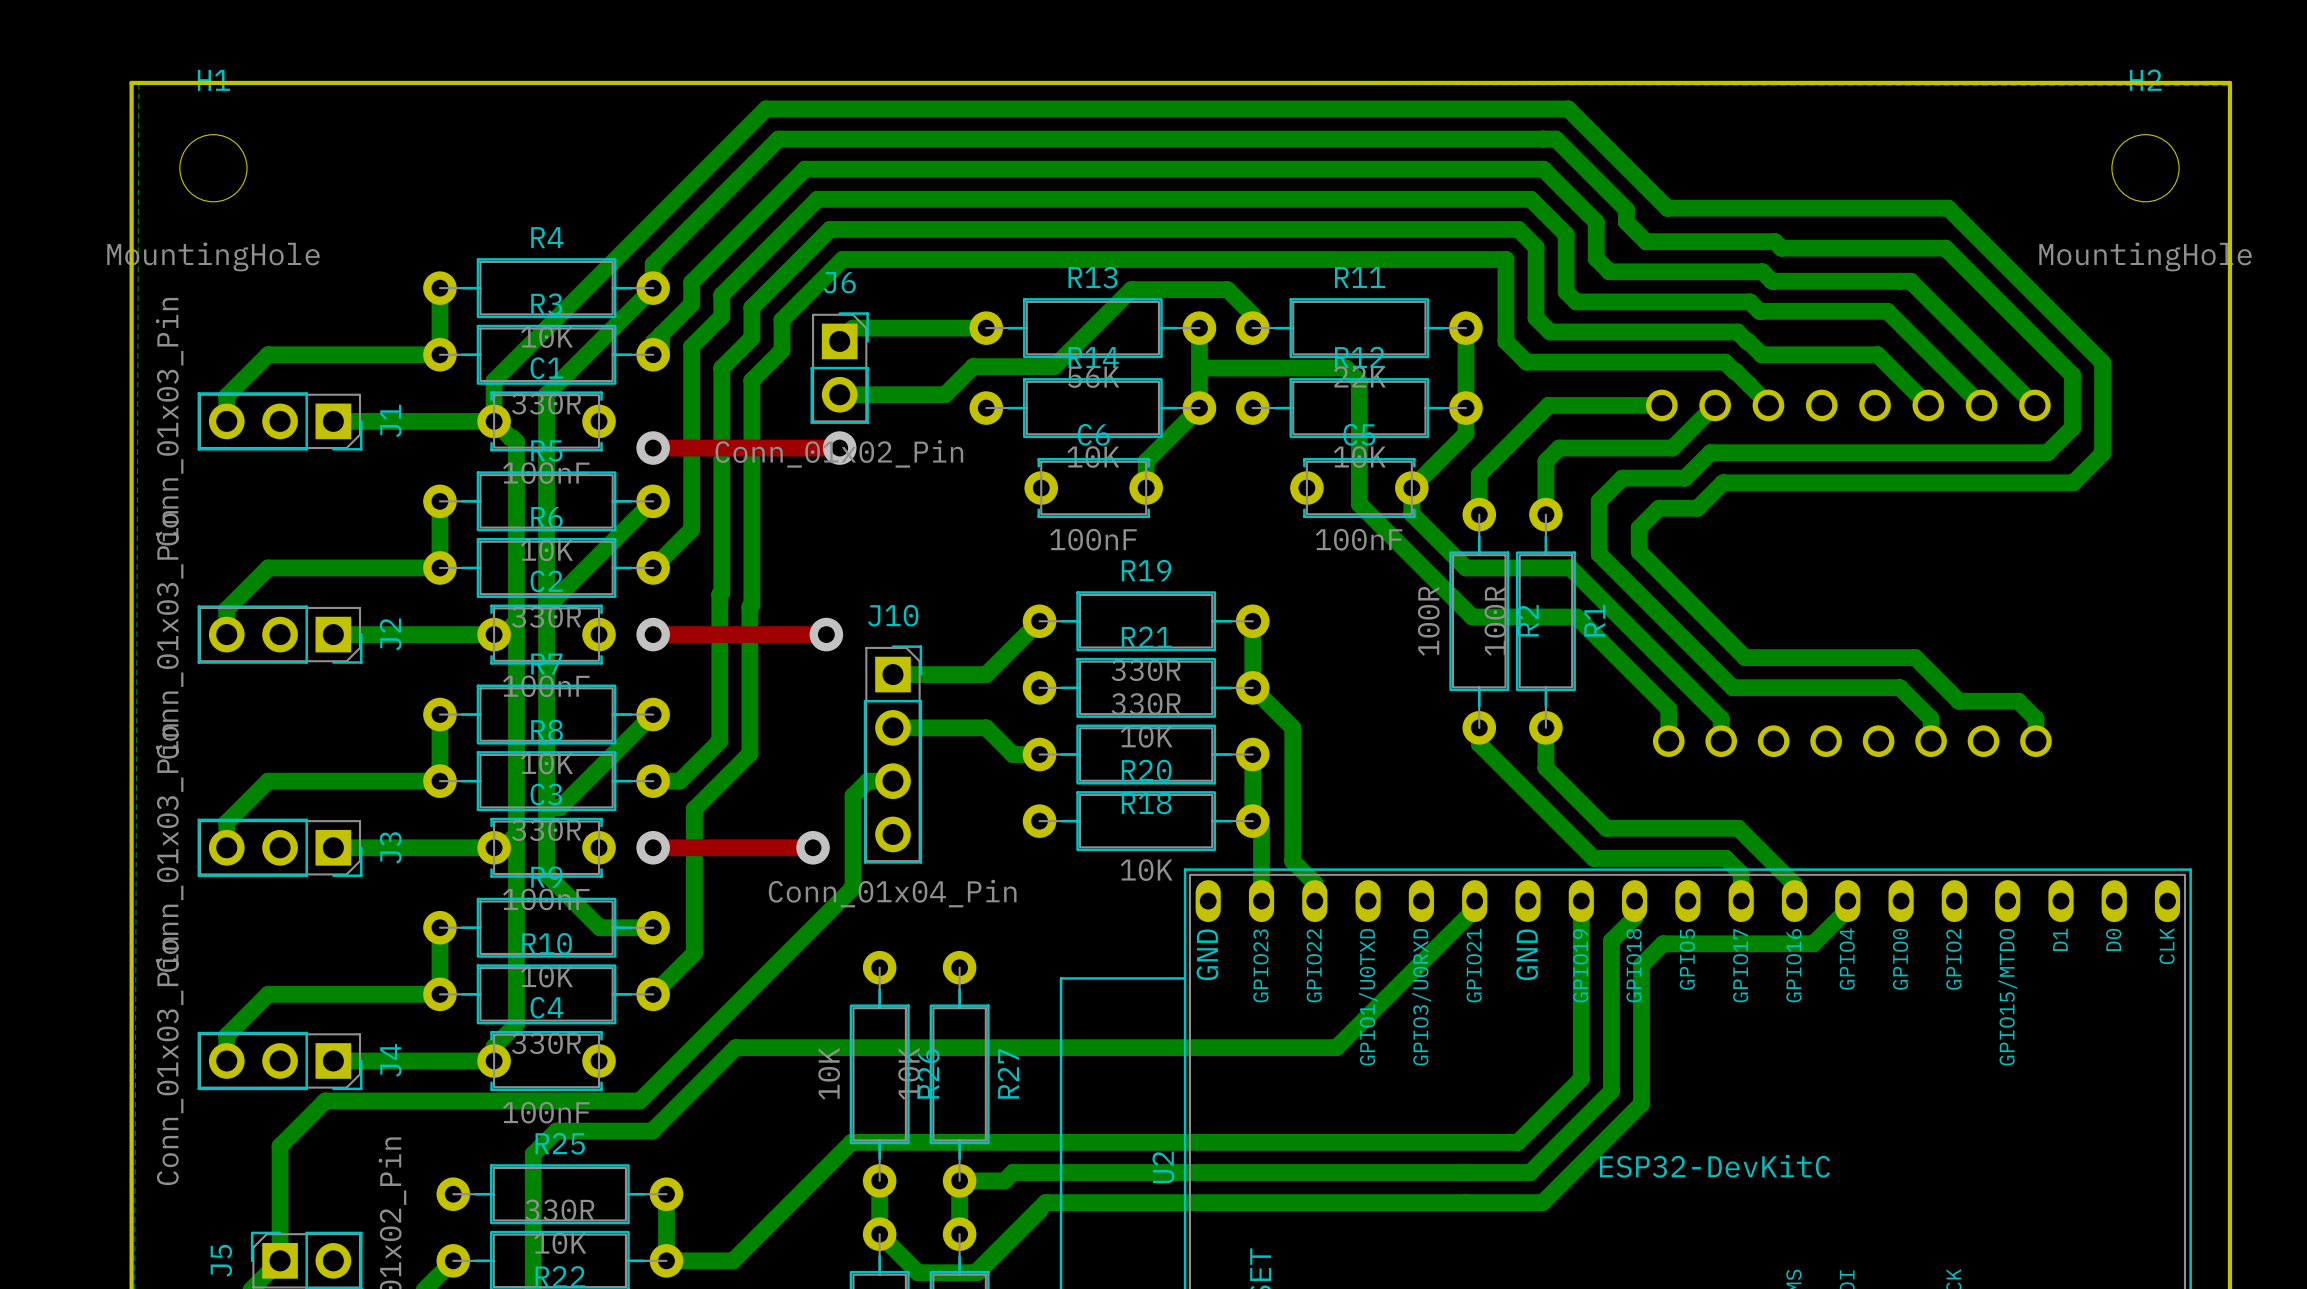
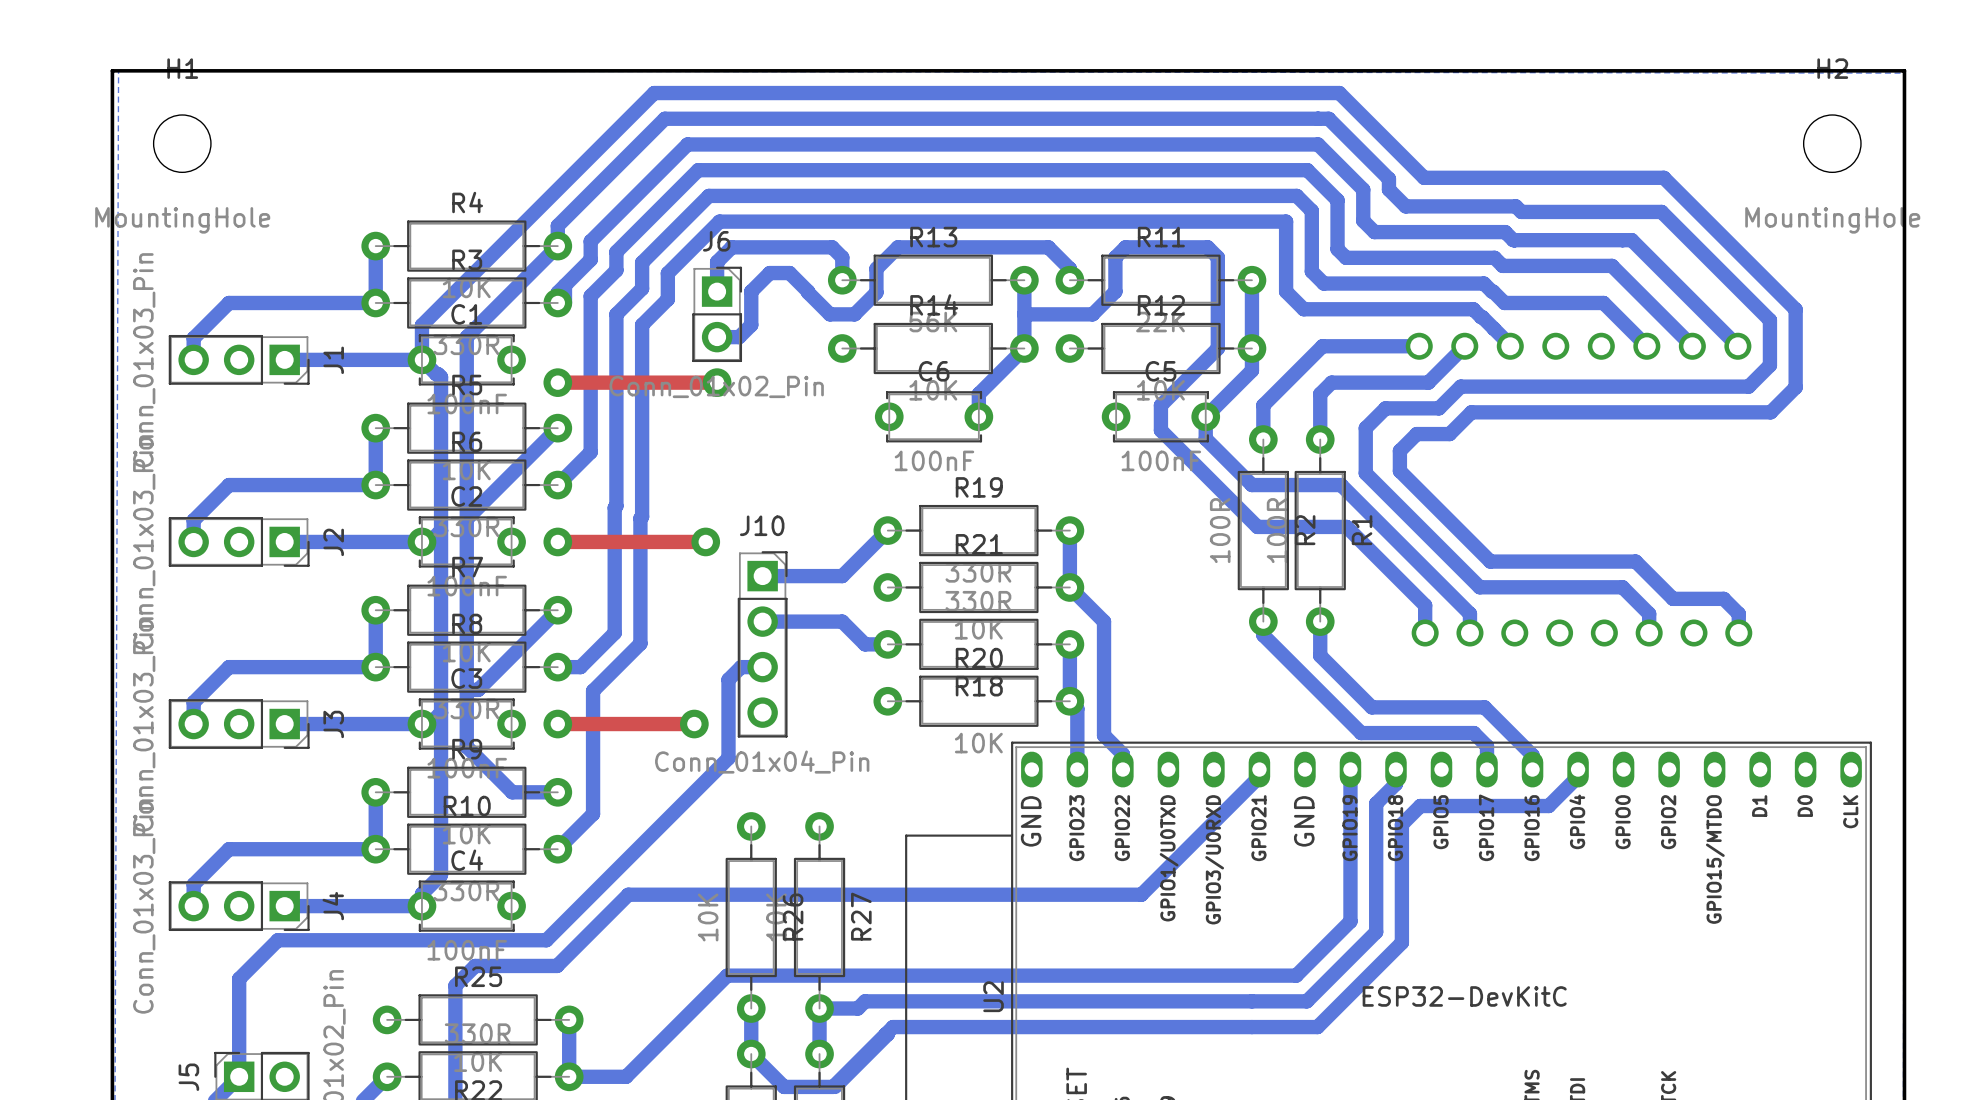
bottom track: (1131, 289) (1054, 366) (973, 366) (945, 394) (865, 394) -> (966, 247) (897, 247) (876, 268) (876, 292) (854, 314) (829, 314) (789, 273) (769, 273) (751, 291) (751, 325) (739, 337)
bottom track: (986, 328) (853, 328) (839, 341) -> (842, 280) (842, 257) (832, 247) (731, 247) (717, 262) (717, 291)
bottom track: (1279, 368) (1346, 368) (1359, 381) (1359, 474) -> (1092, 314) (1115, 291) (1115, 257) (1125, 247) (1207, 247) (1217, 257) (1217, 348) (1160, 405)

